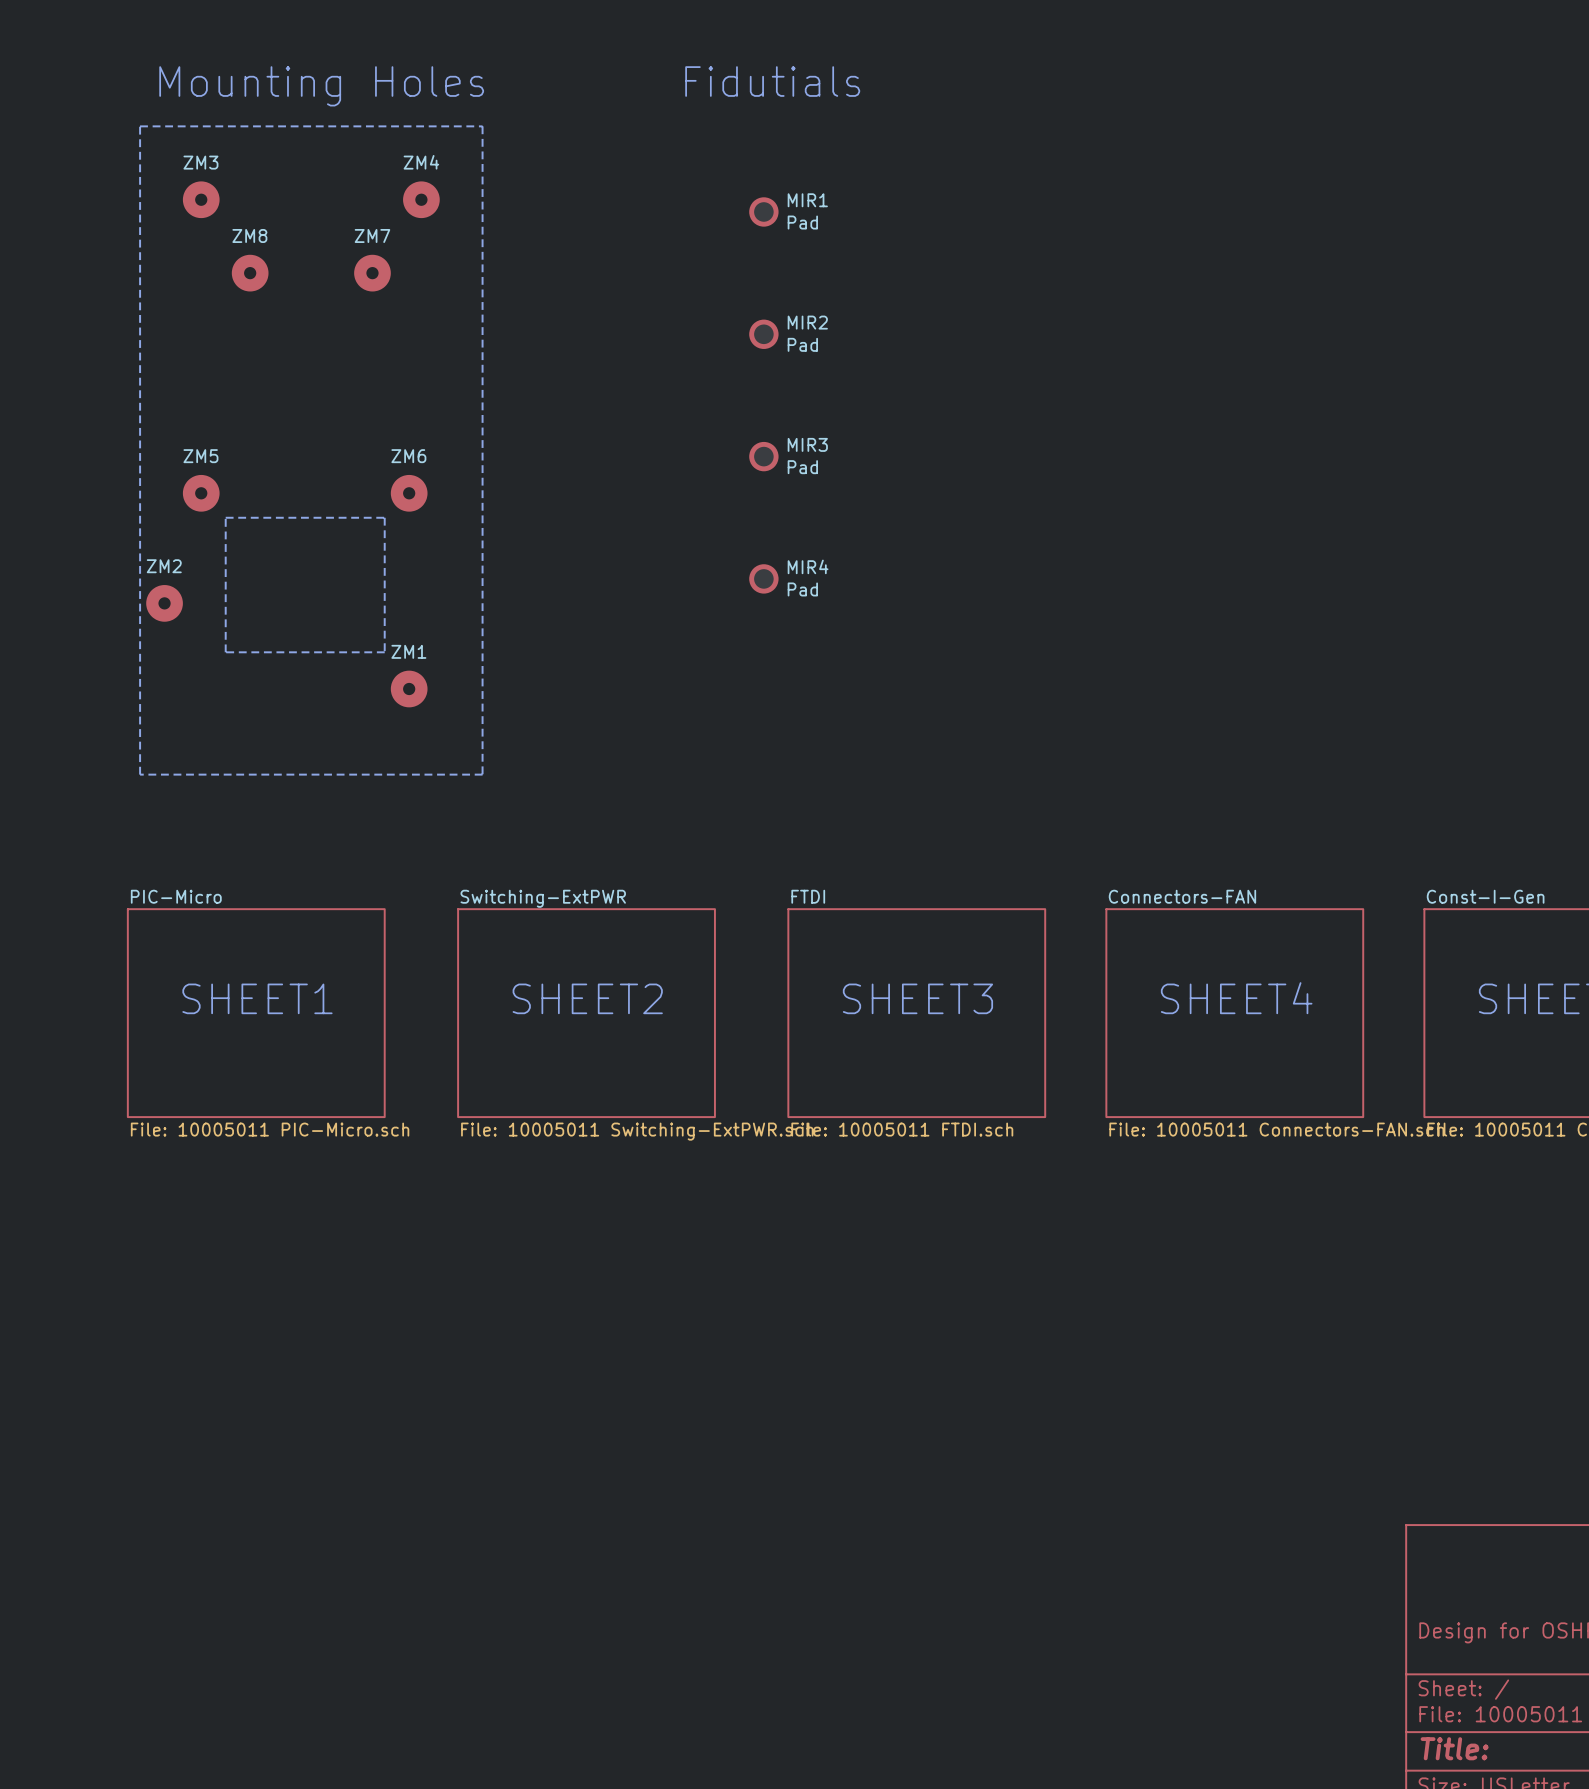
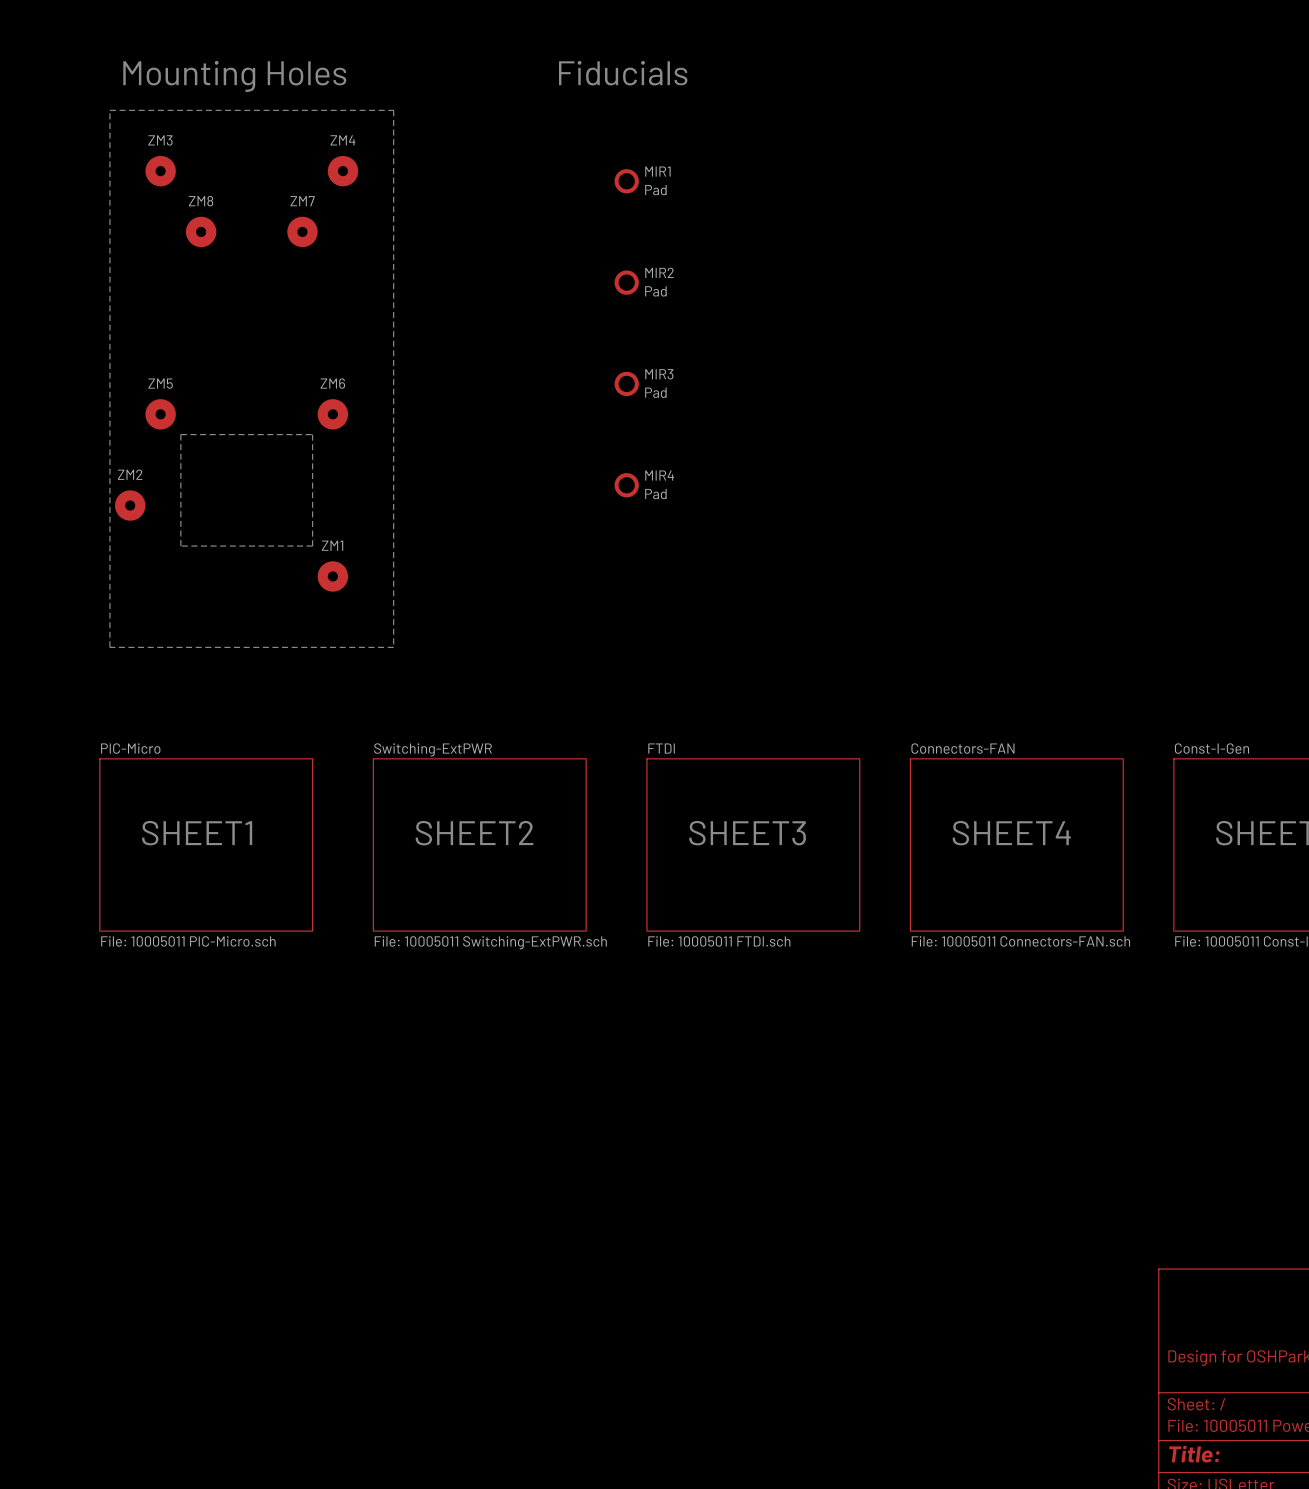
text: Fidutials (772, 81) -> Fiducials (623, 73)

